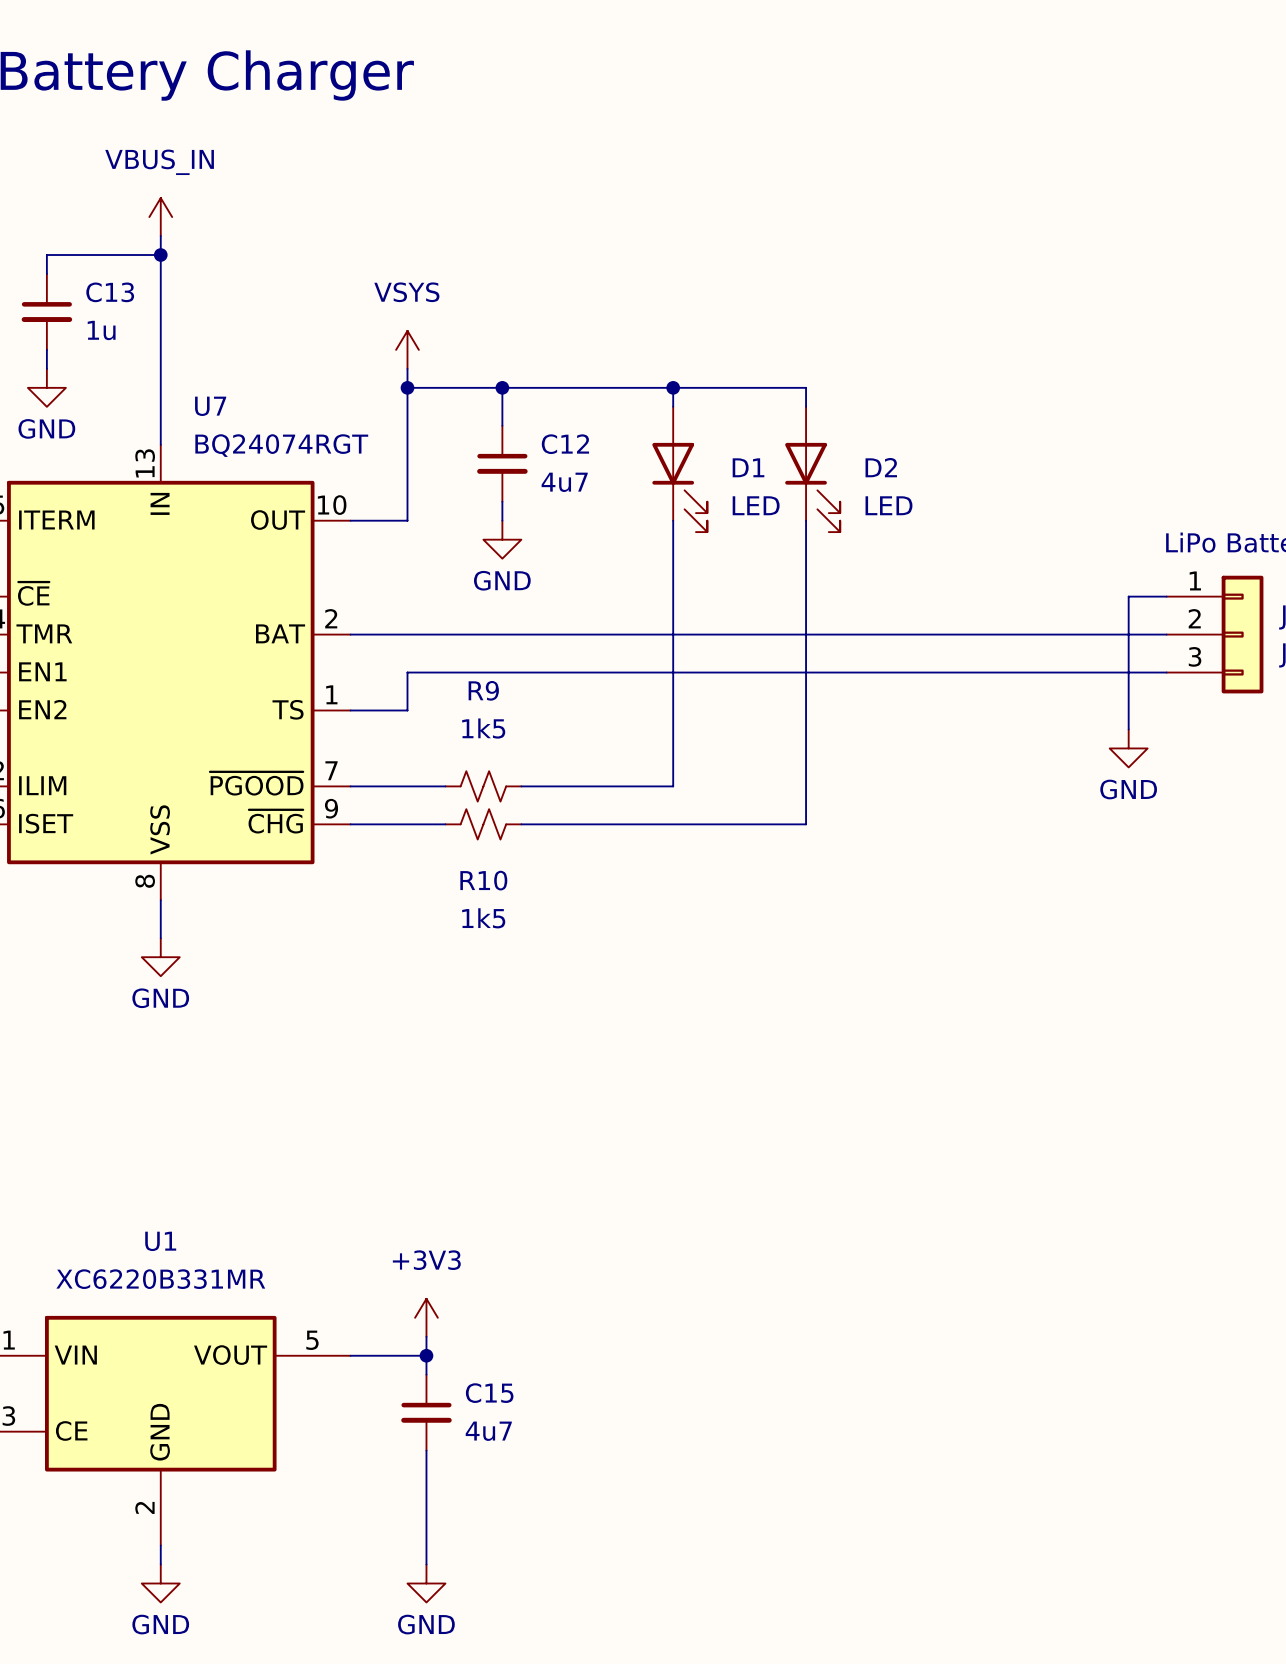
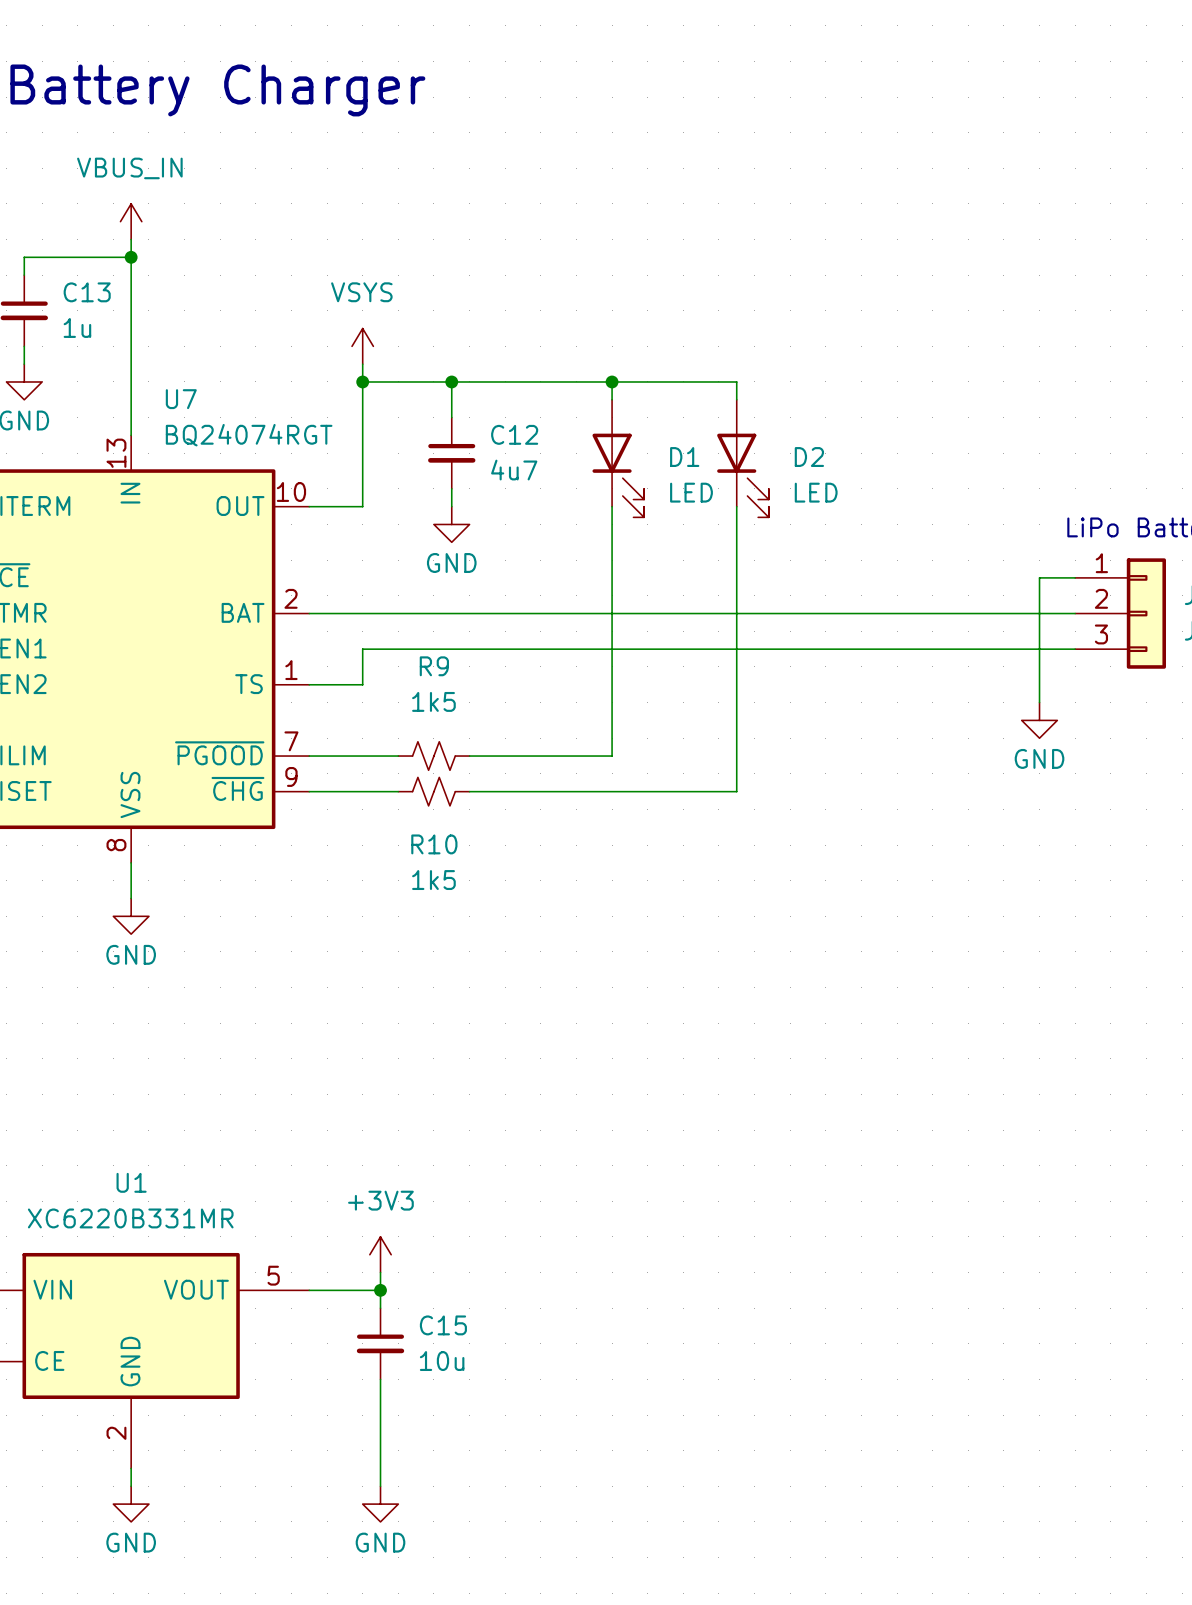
C15 value: 4u7 (488, 1431) -> 10u (442, 1361)

